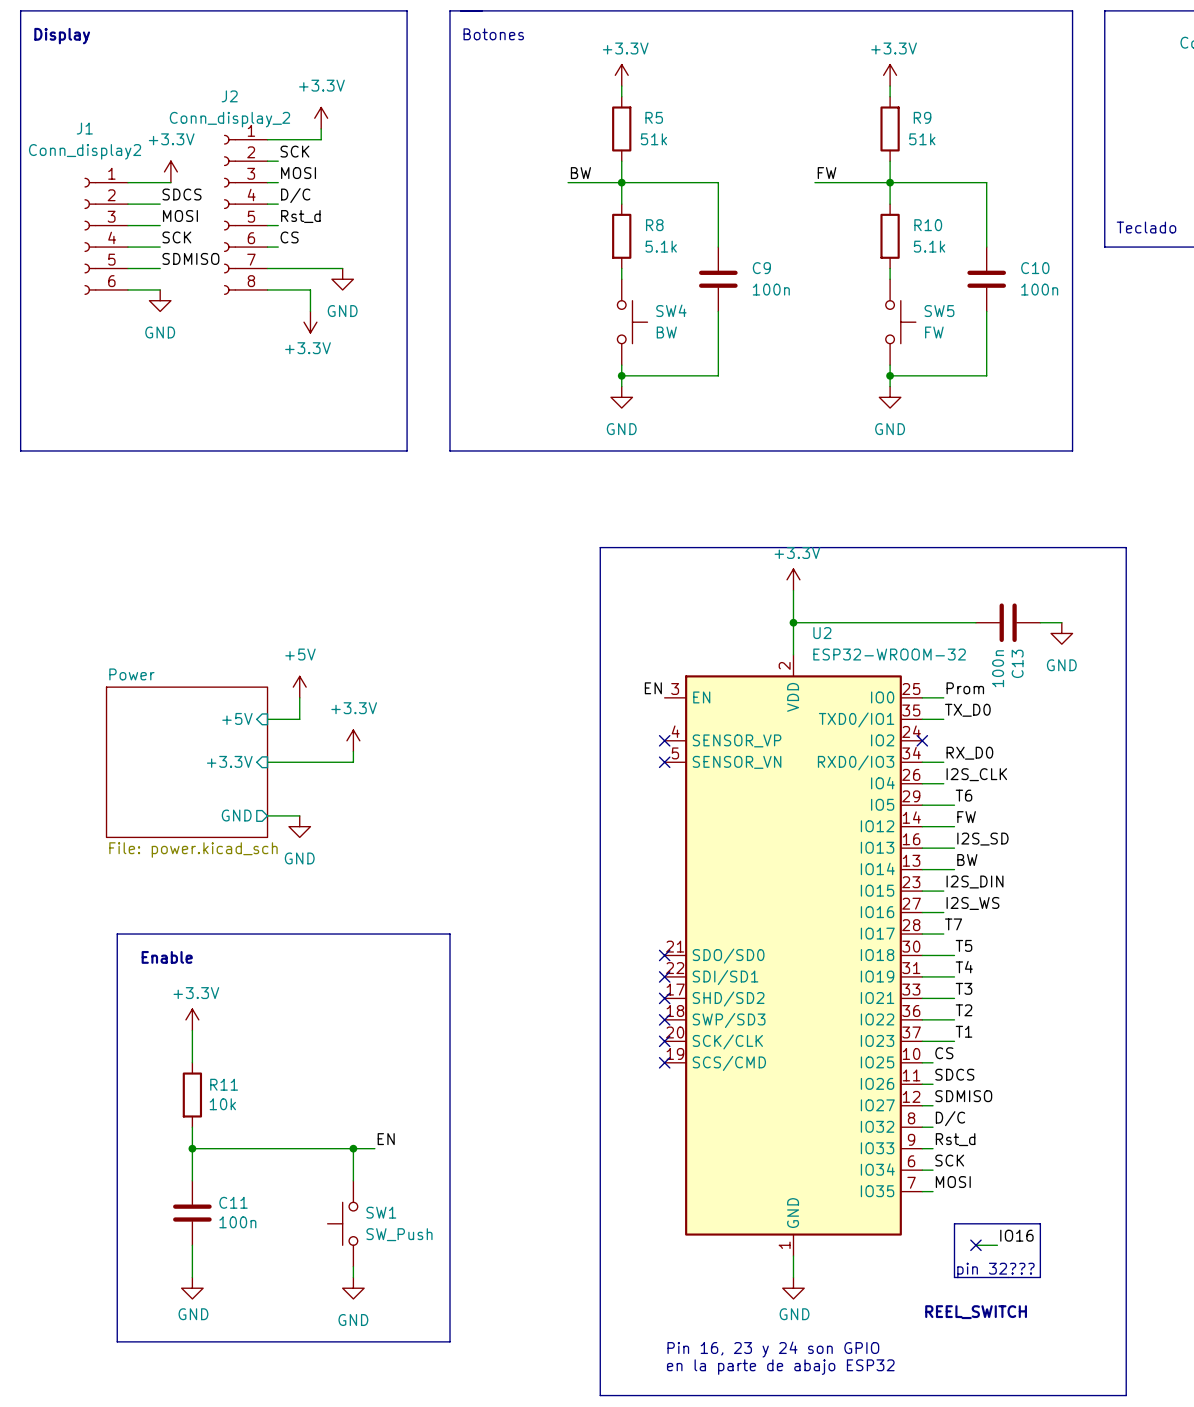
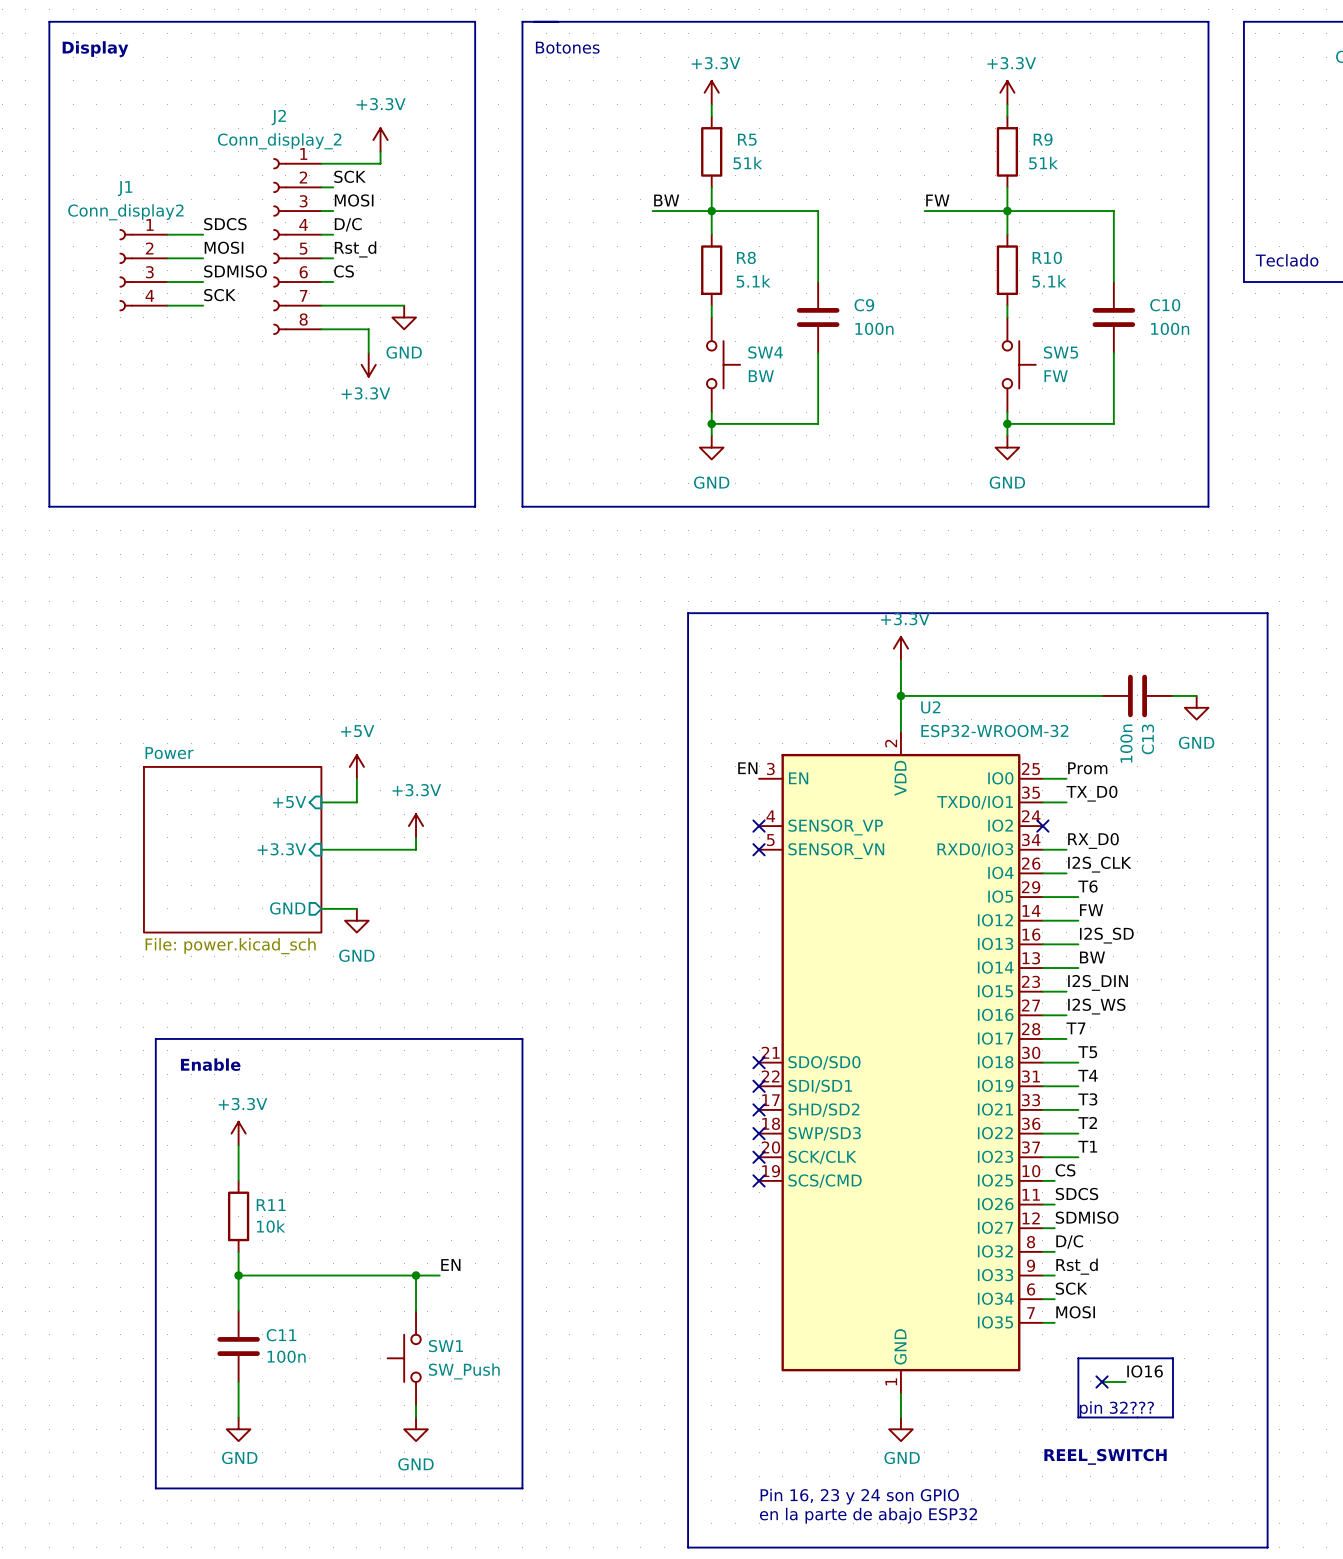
J1 name position: J1 (84, 128) -> J1 (125, 188)
J1 value position: Conn_display2 (85, 151) -> Conn_display2 (125, 212)
power symbol: +3.3V (170, 171) -> none
J1 symbol: [84, 177, 128, 295] -> [119, 229, 168, 312]
wire: (127, 182) (170, 182) -> none
label: SCK (176, 237) -> SDMISO (235, 271)
label: SDMISO (190, 258) -> SCK (219, 295)
wire: (127, 289) (160, 289) -> none
power symbol: GND (160, 300) -> none

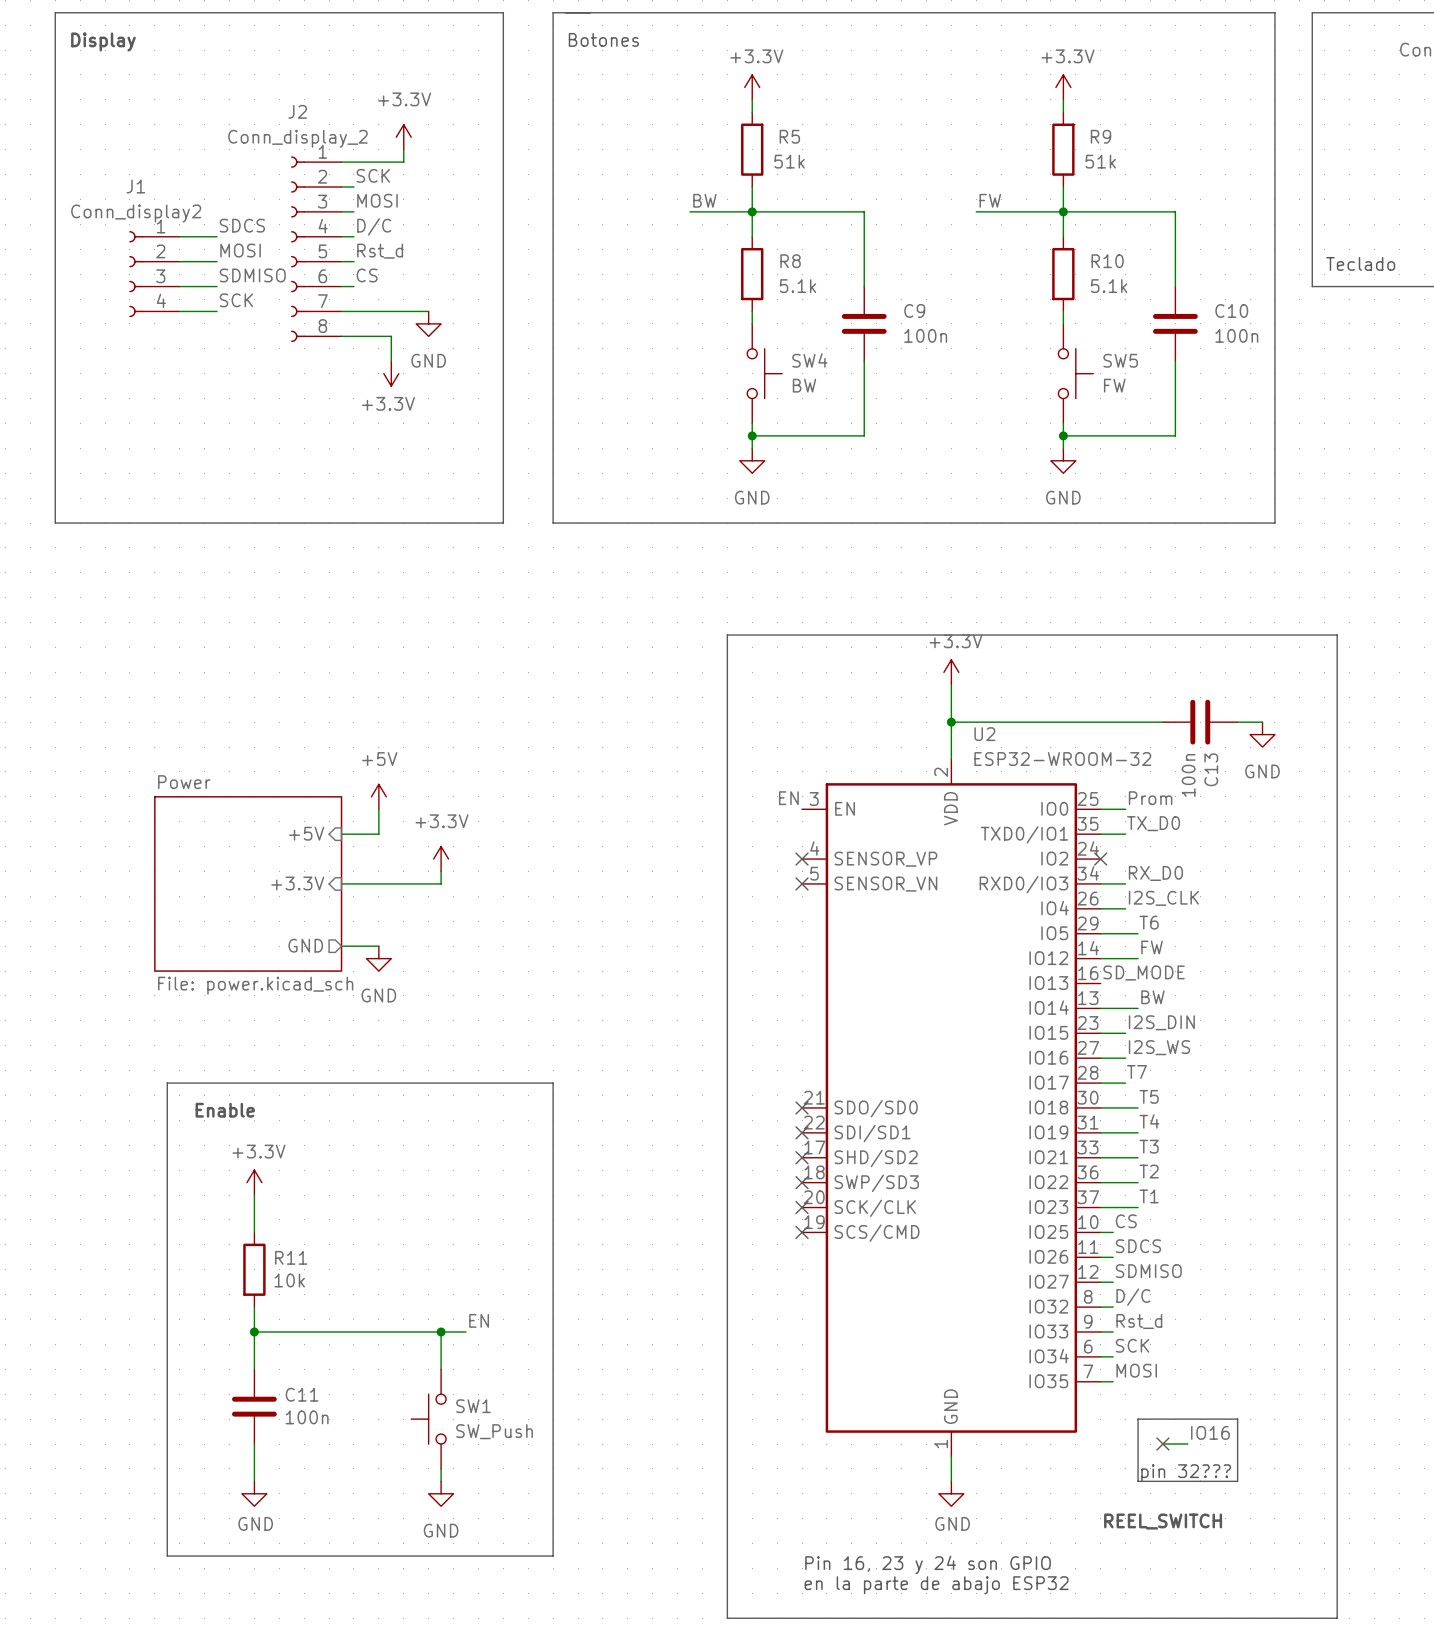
label: none -> SD_MODE (1144, 973)
label: I2S_SD (1106, 935) -> none
wire: (1042, 944) (1078, 944) -> none

